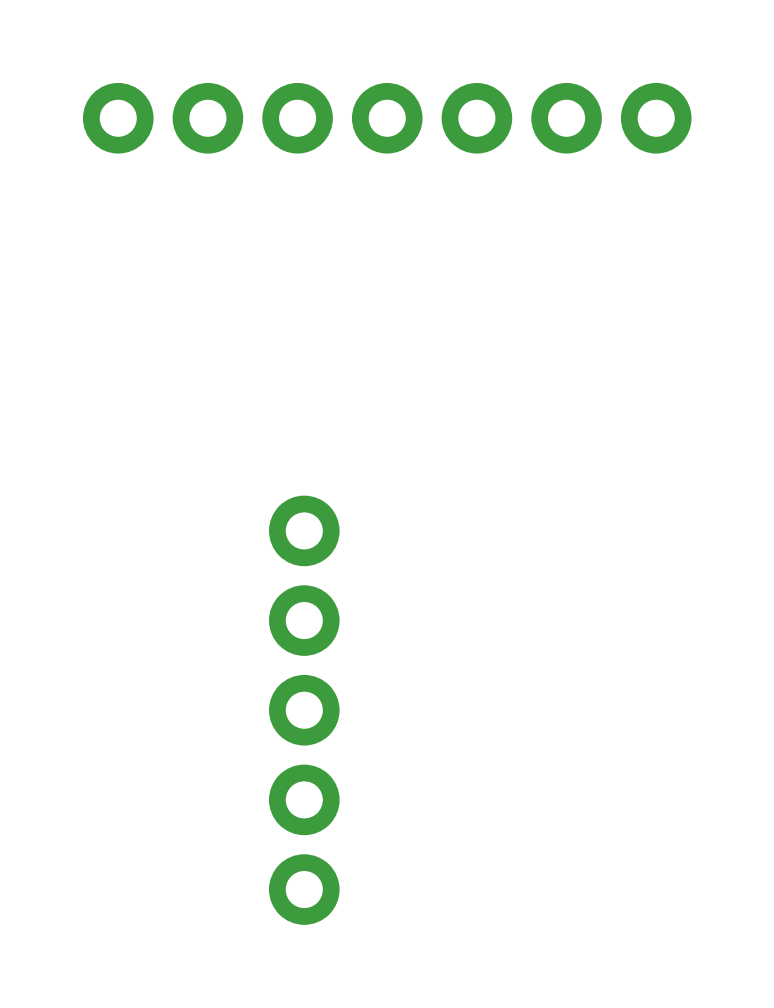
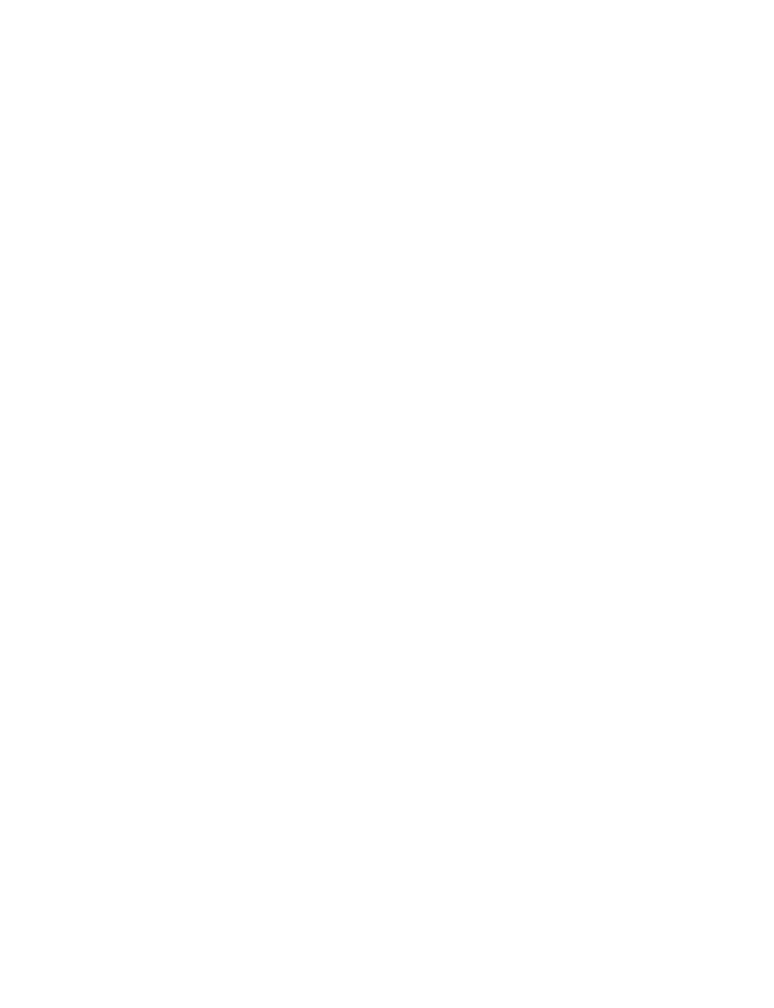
part: (387, 118) -> none
part: (304, 710) -> none

